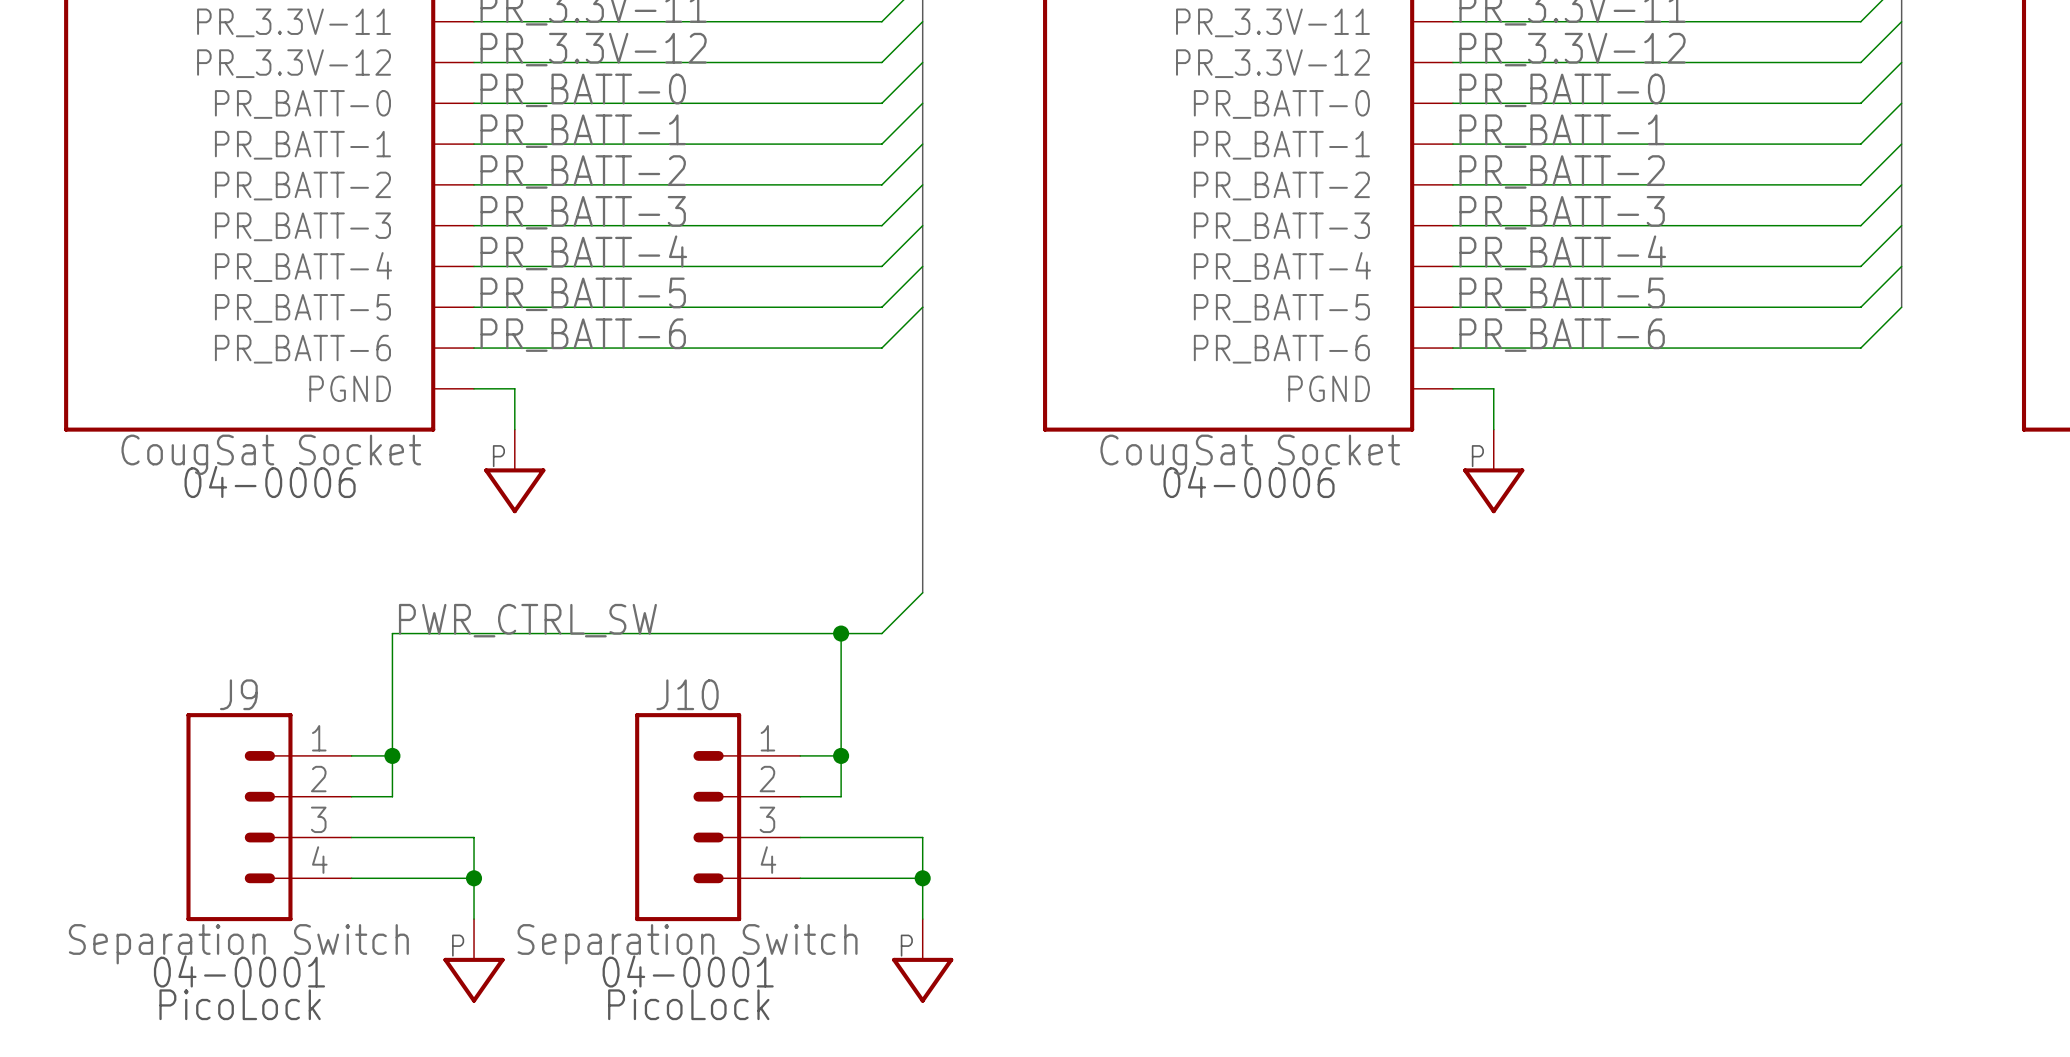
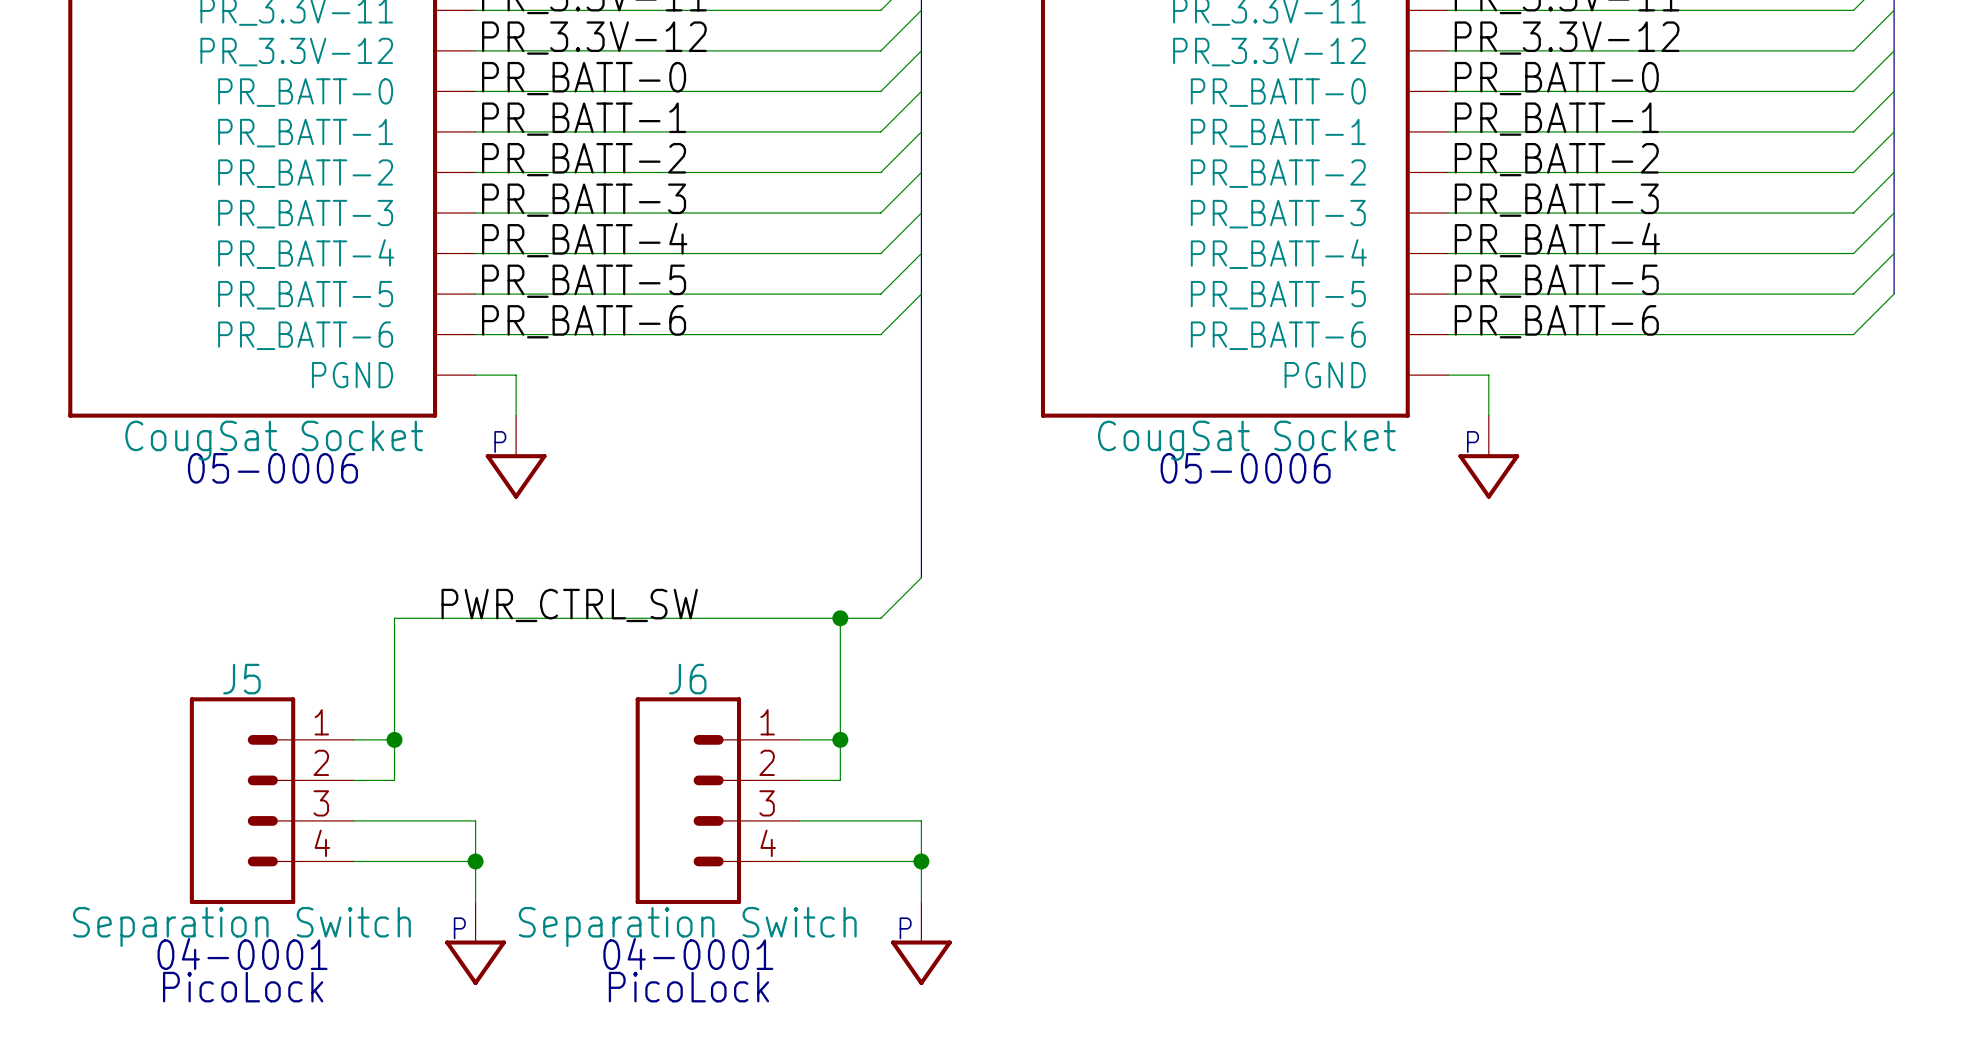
part text: 04-0006 (270, 481) -> 05-0006 (272, 468)
part text: 04-0006 (1249, 481) -> 05-0006 (1245, 468)
label position: PWR_CTRL_SW (527, 620) -> PWR_CTRL_SW (569, 605)
J9 name: J9 (238, 694) -> J5 (241, 679)
J10 name: J10 (687, 694) -> J6 (687, 679)

